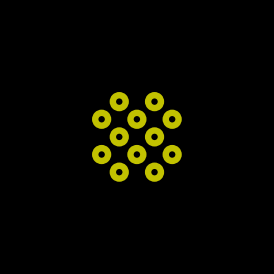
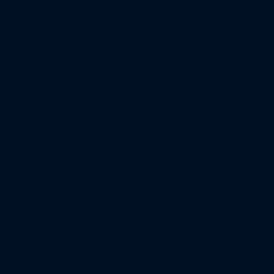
part: (136, 136) -> none

